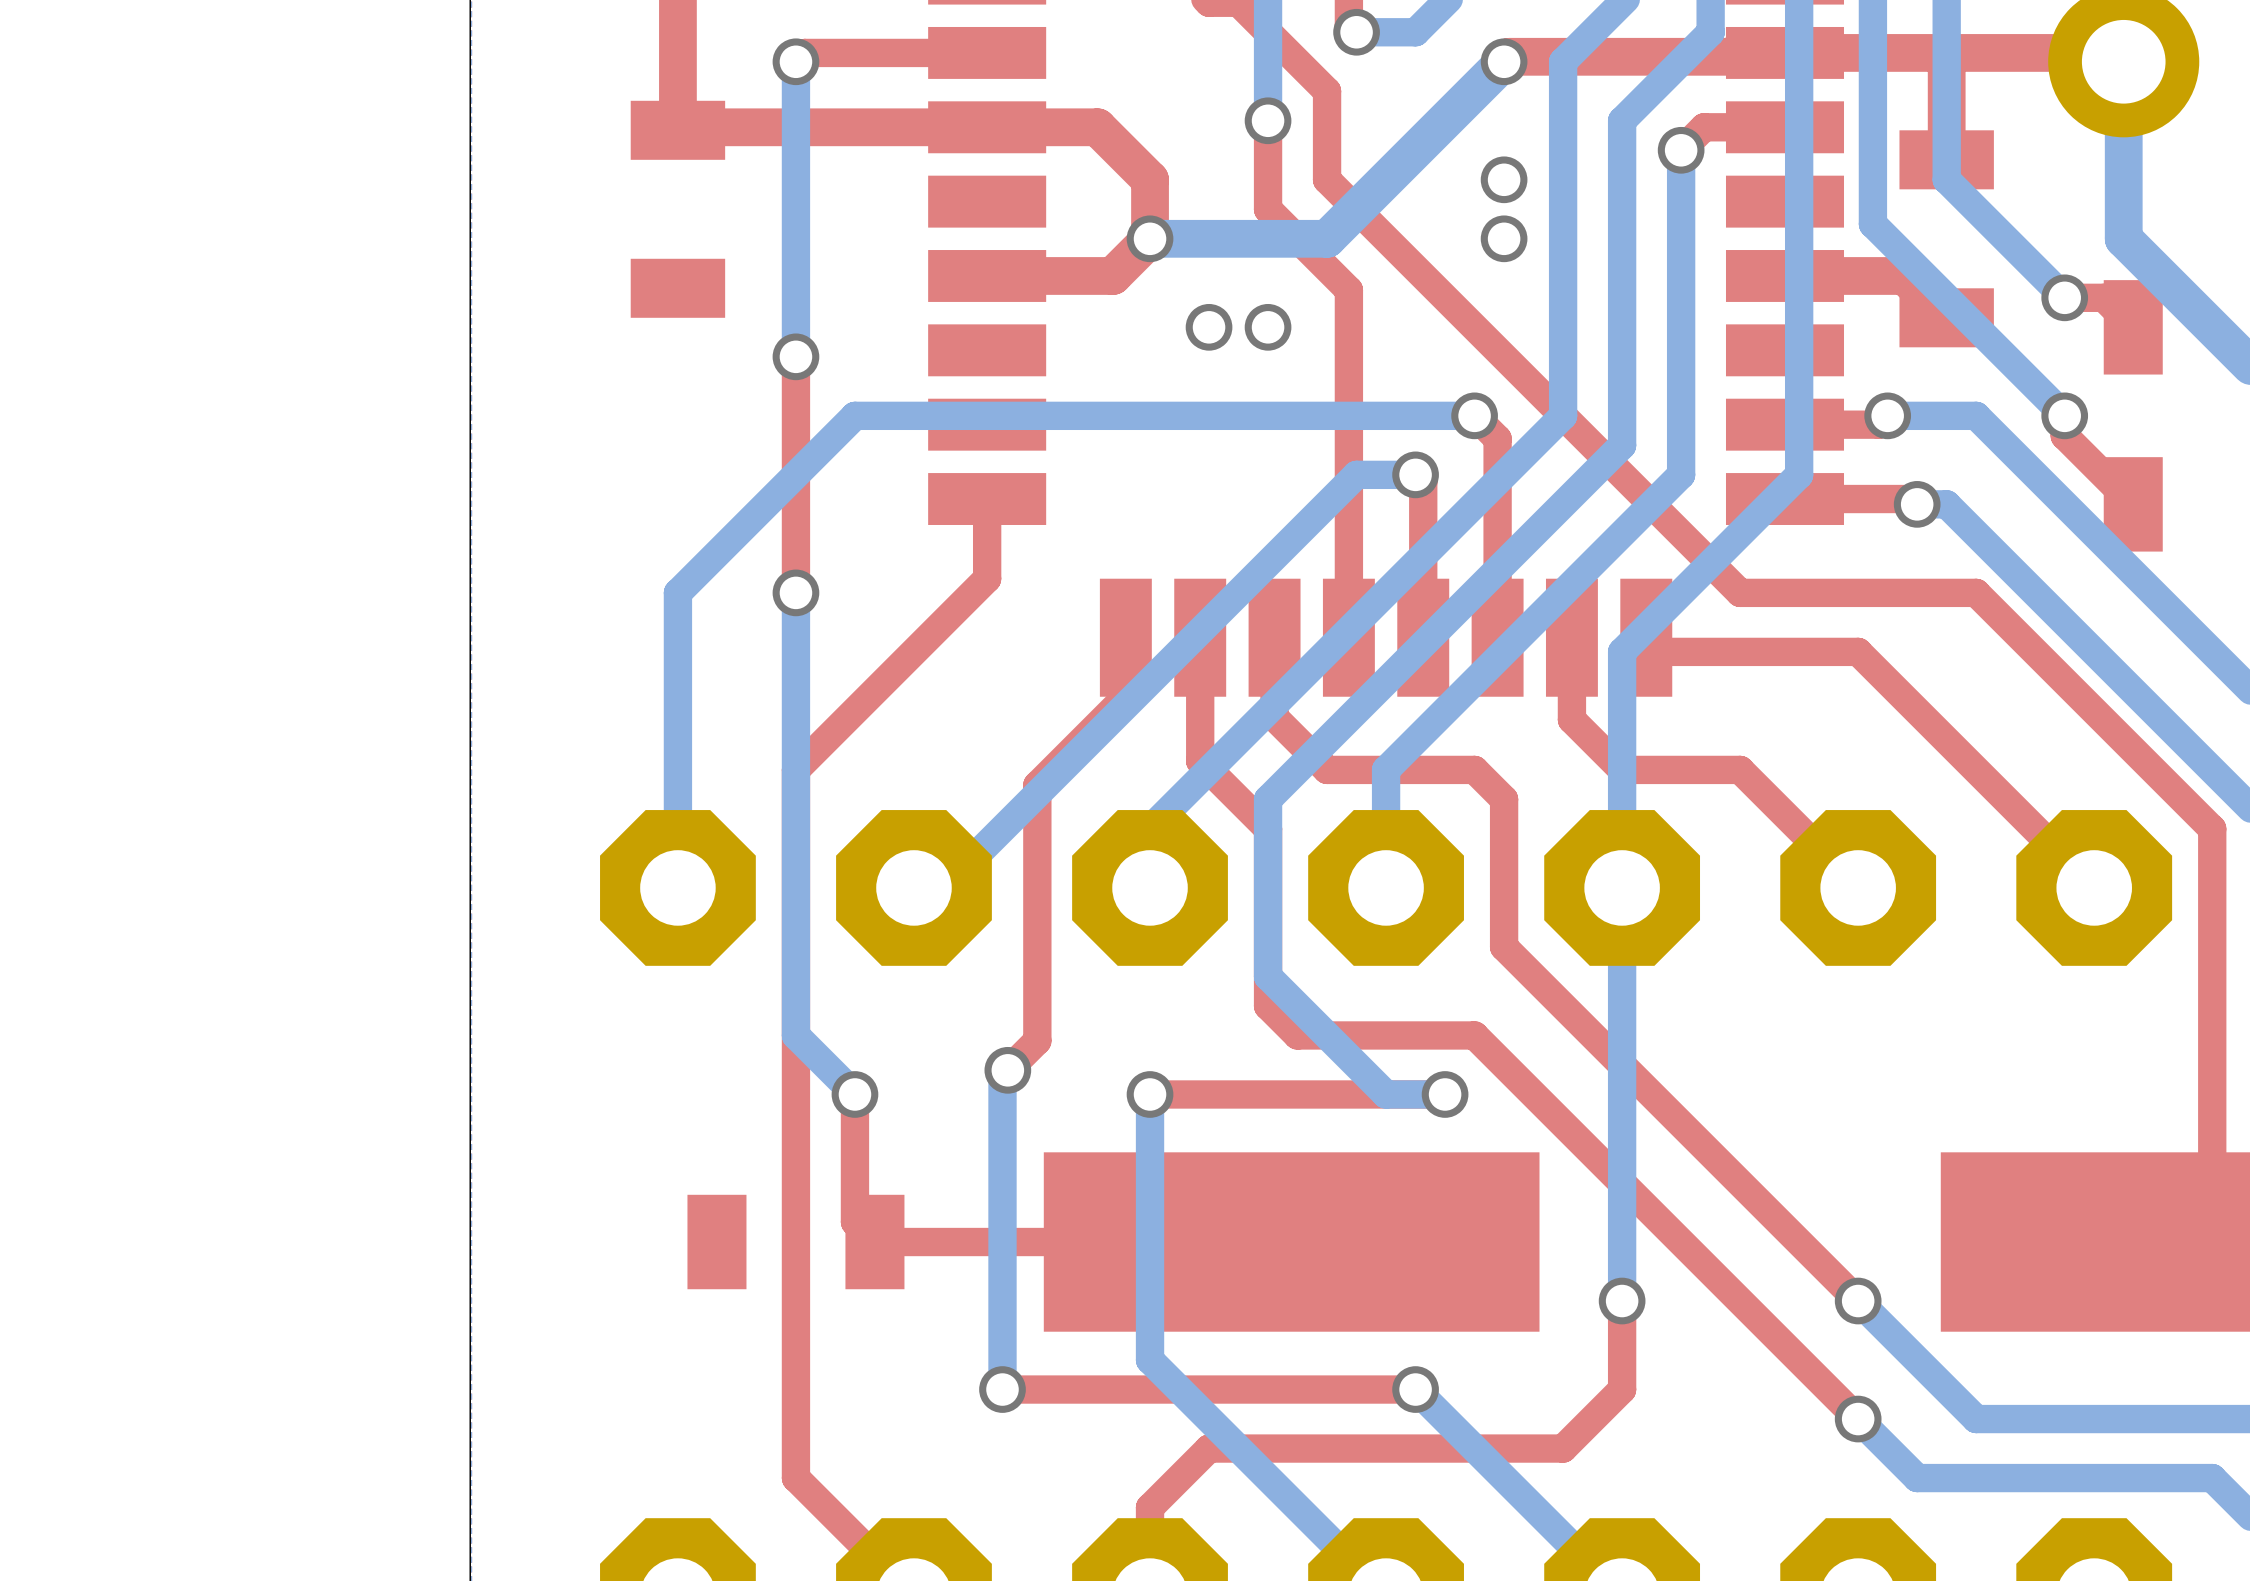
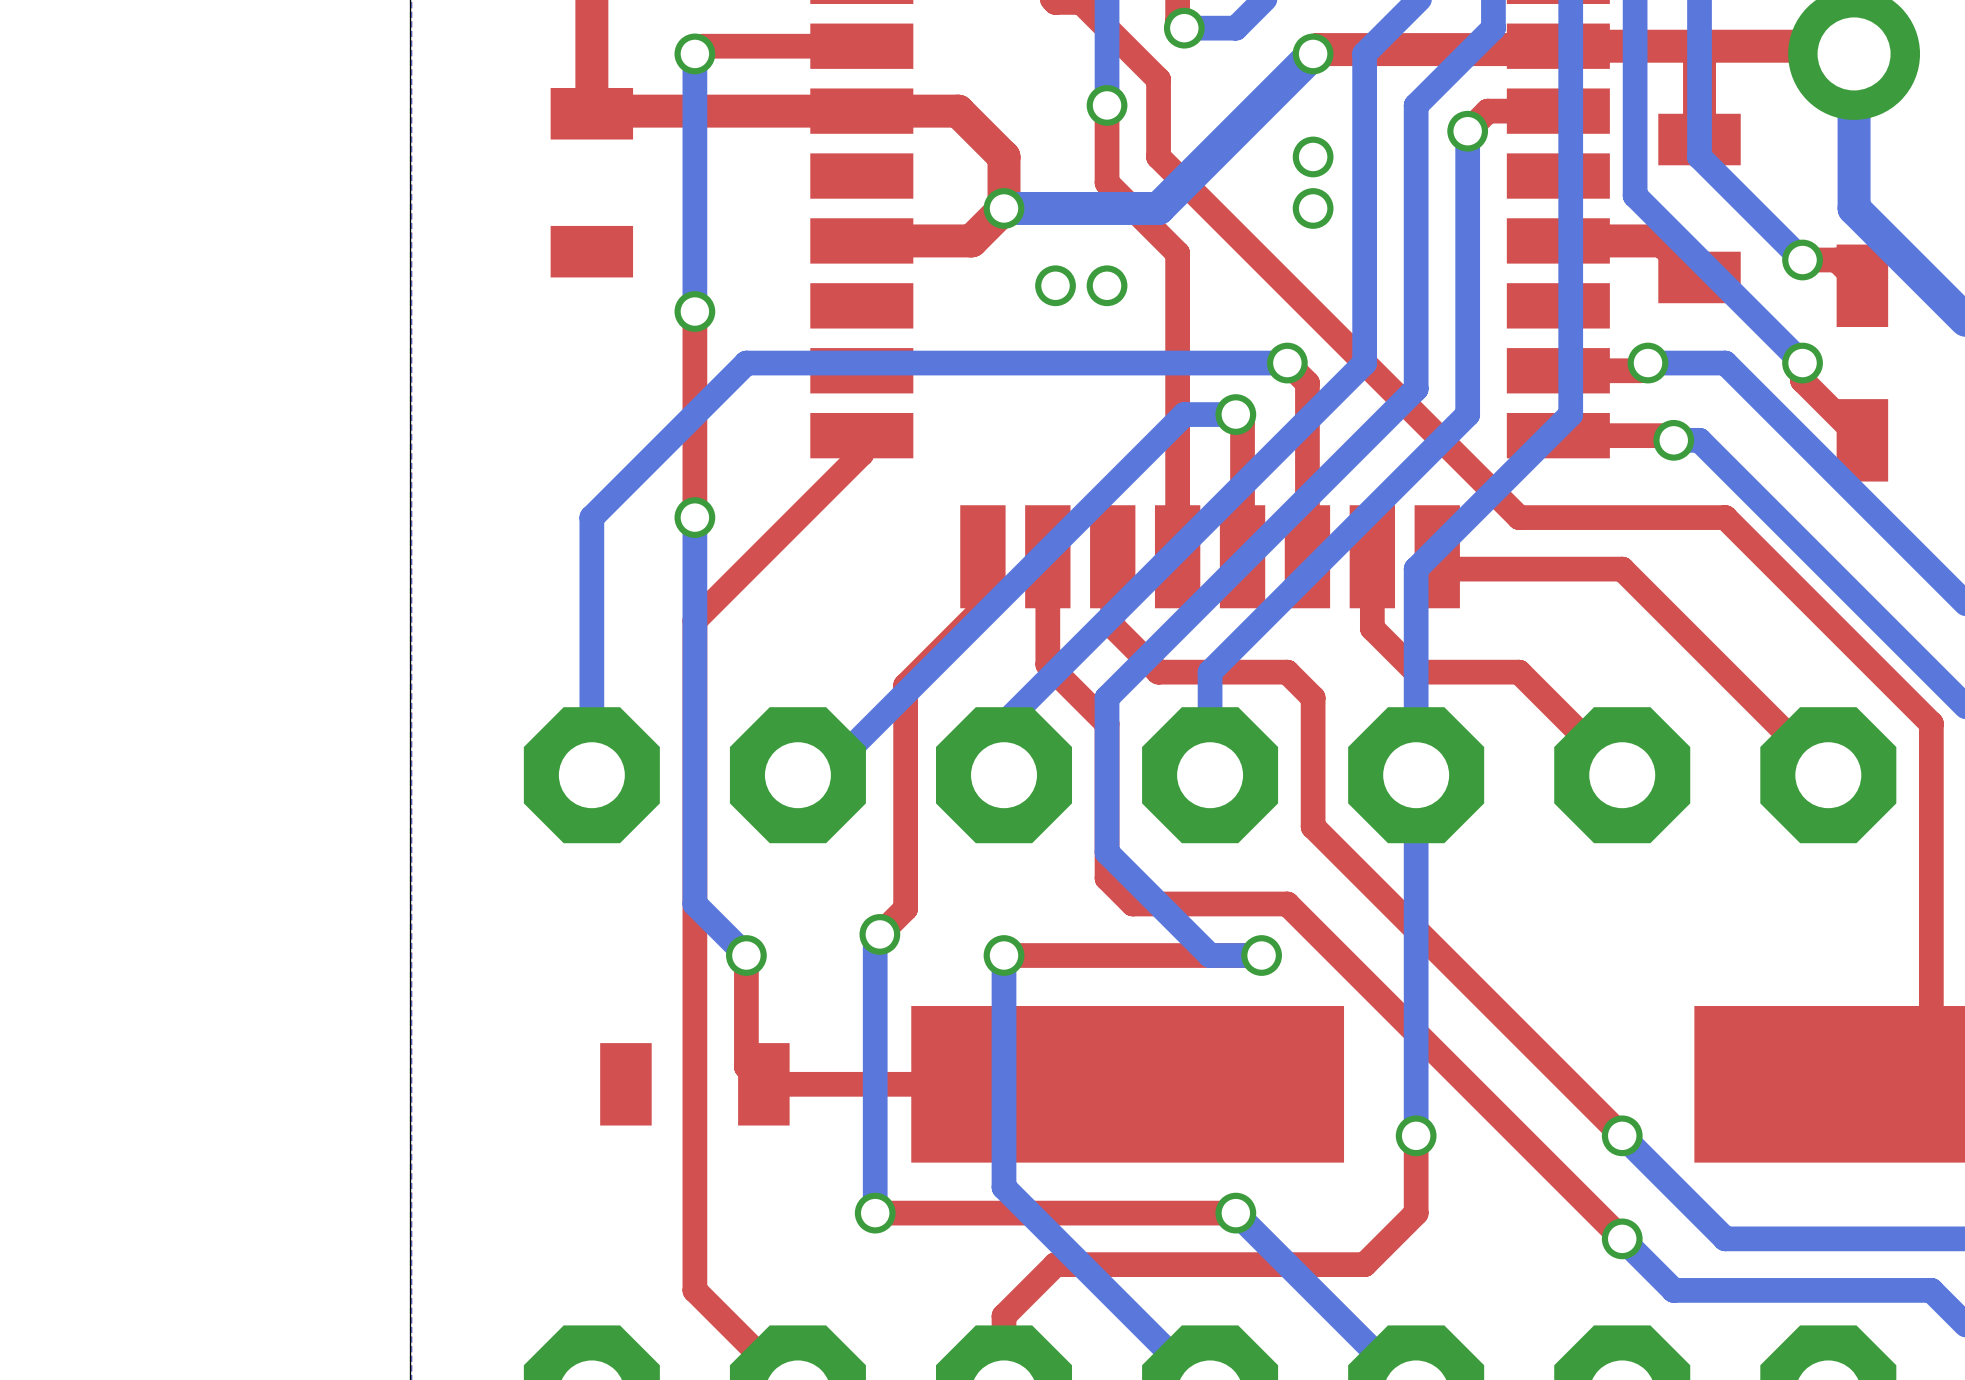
top track: (987, 519) (987, 578) (795, 769) -> (861, 453) (694, 620) (694, 672)

